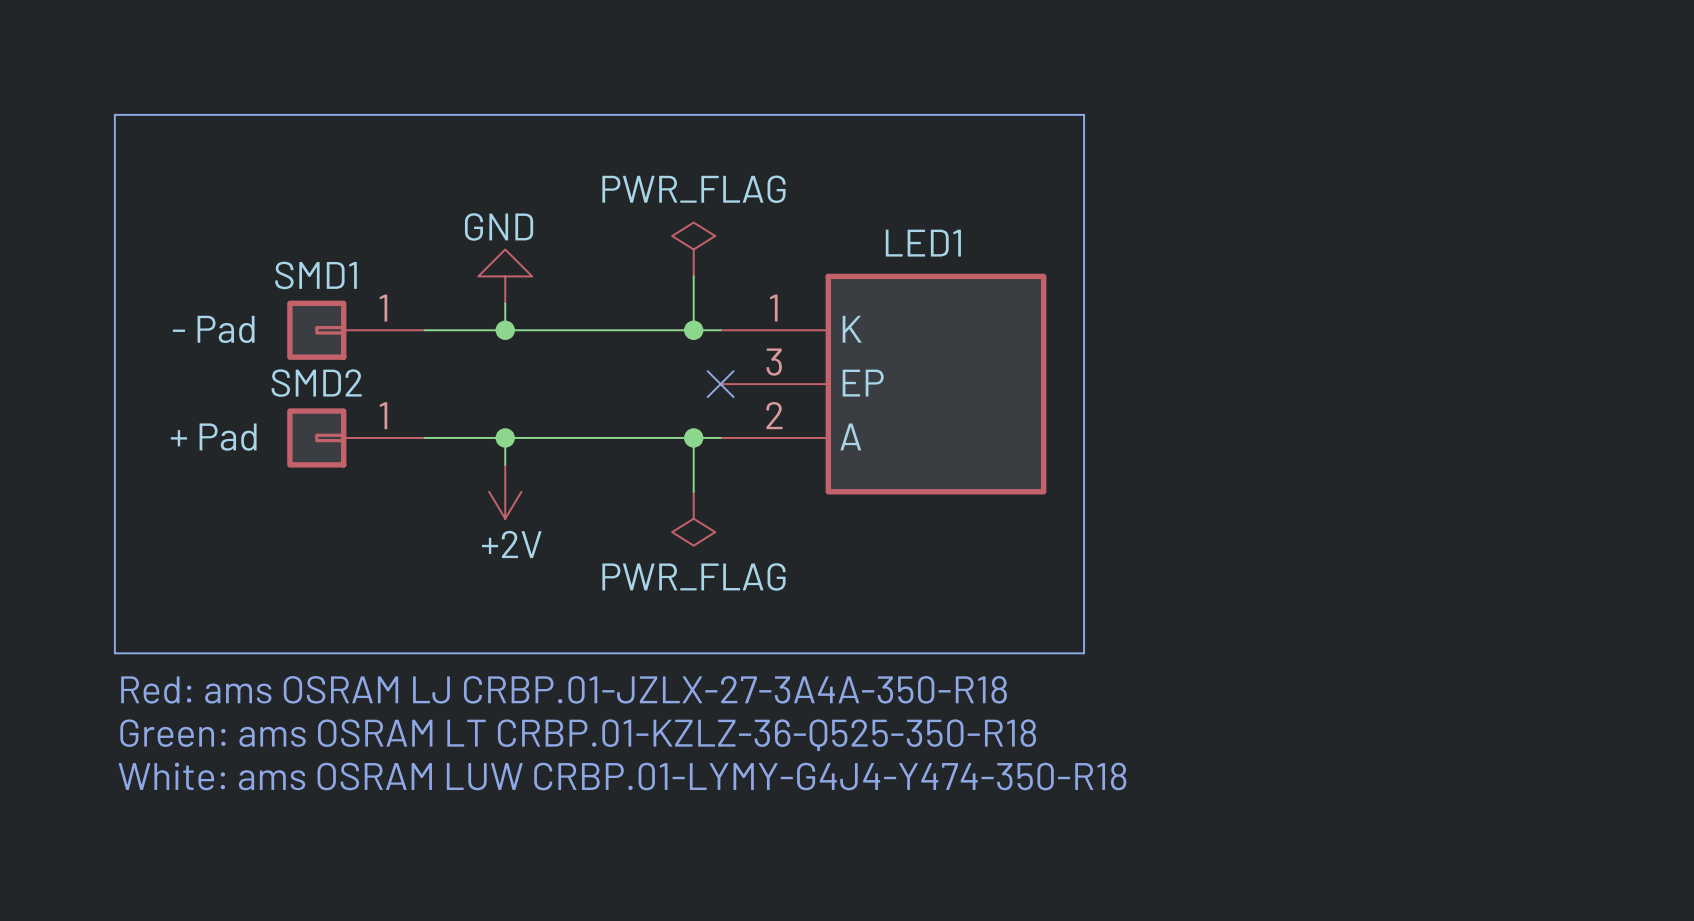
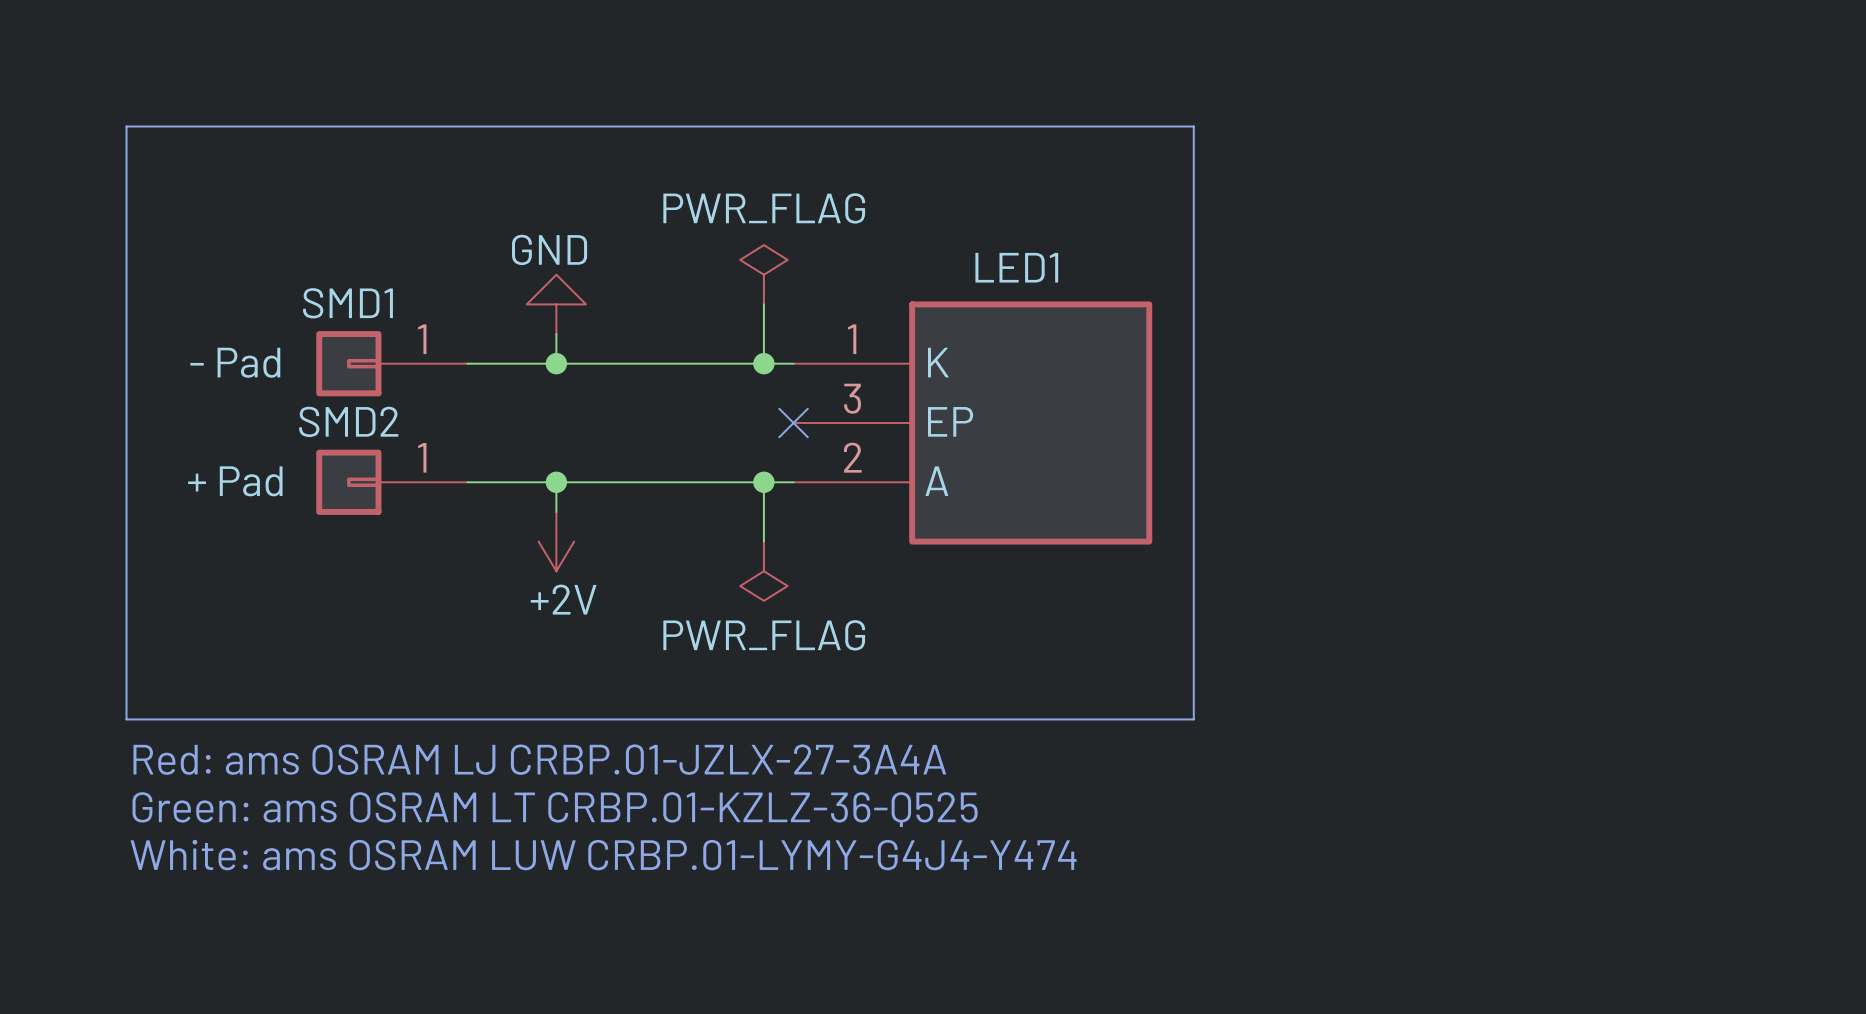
text: Red: ams OSRAM LJ CRBP.01-JZLX-27-3A4A-350-R18 (564, 689) -> Red: ams OSRAM LJ CRBP.01-JZLX-27-3A4A (539, 759)
text: Green: ams OSRAM LT CRBP.01-KZLZ-36-Q525-350-R18 (578, 735) -> Green: ams OSRAM LT CRBP.01-KZLZ-36-Q525 (555, 809)
text: White: ams OSRAM LUW CRBP.01-LYMY-G4J4-Y474-350-R18 (622, 776) -> White: ams OSRAM LUW CRBP.01-LYMY-G4J4-Y474 (603, 855)

